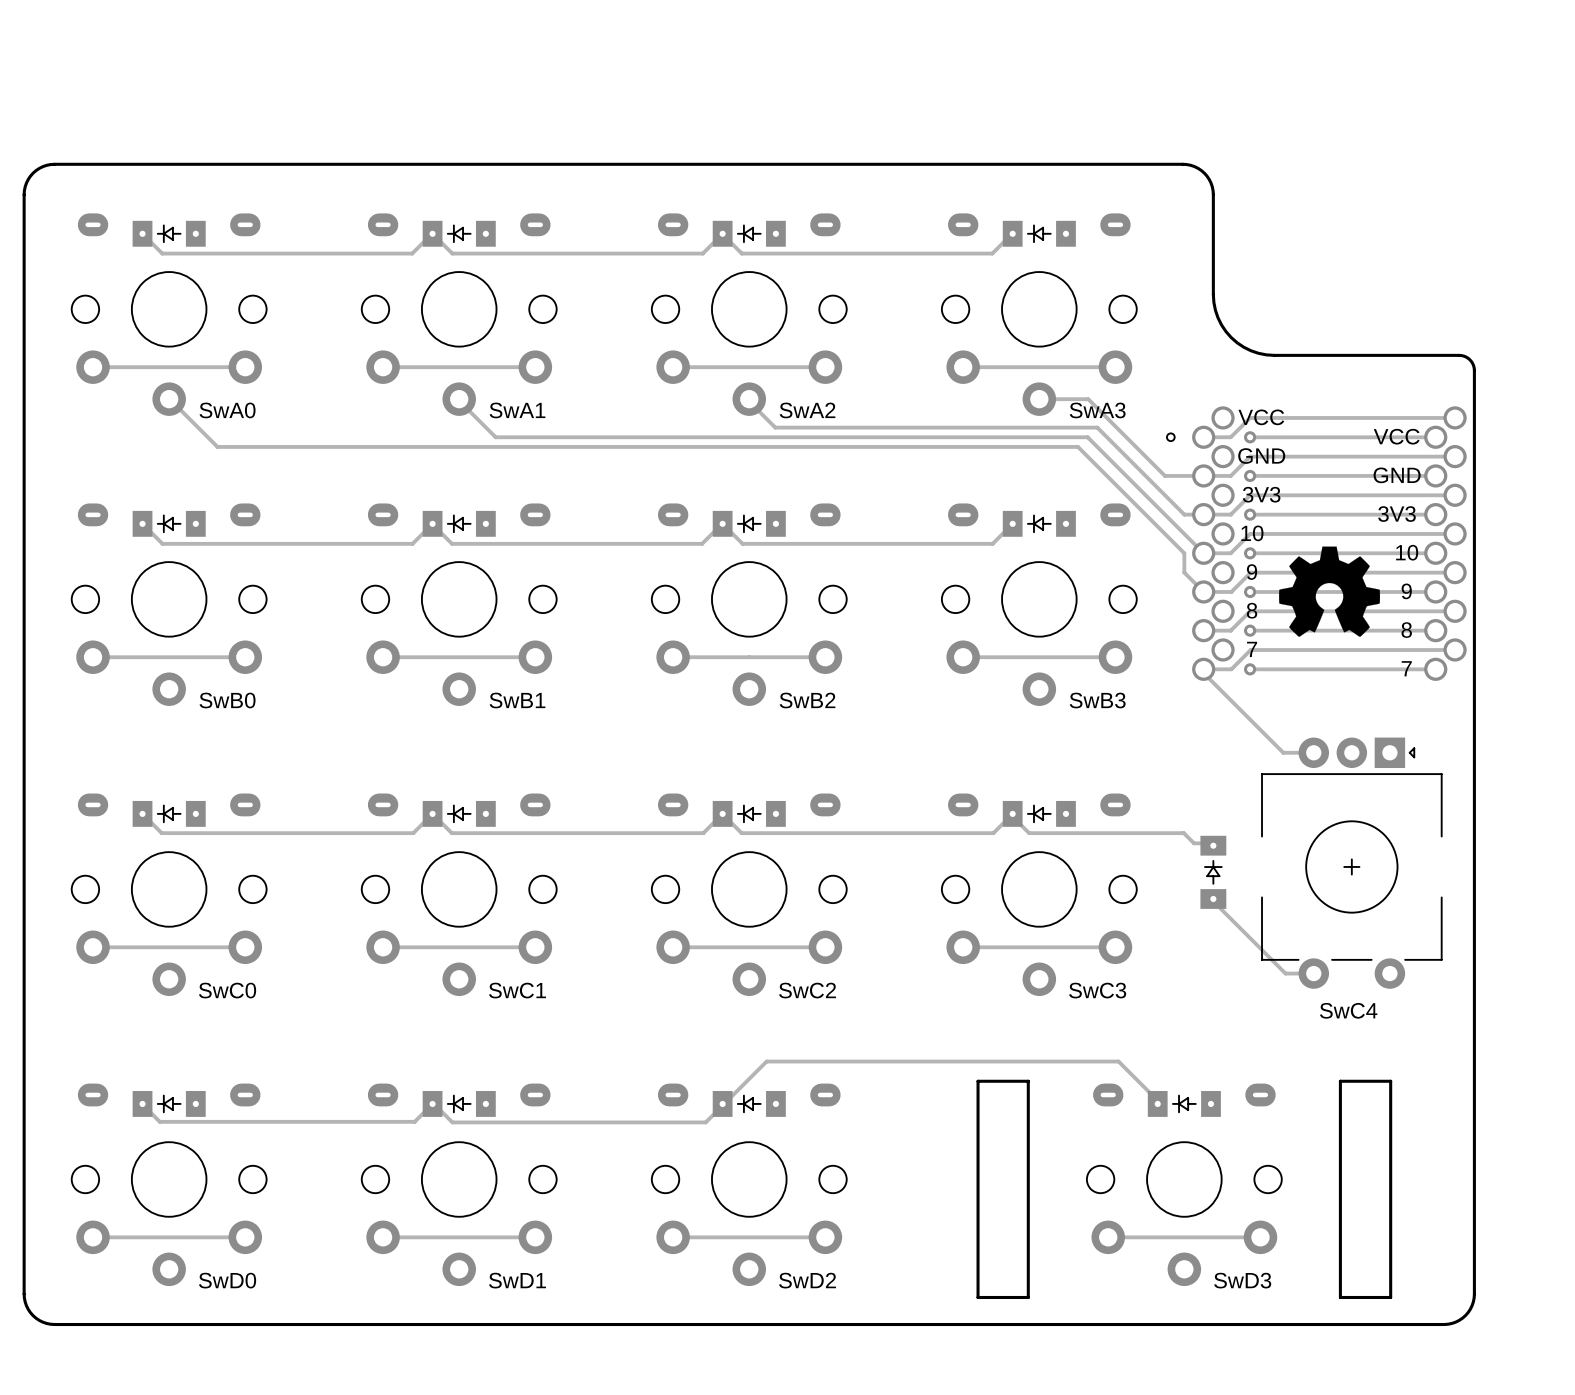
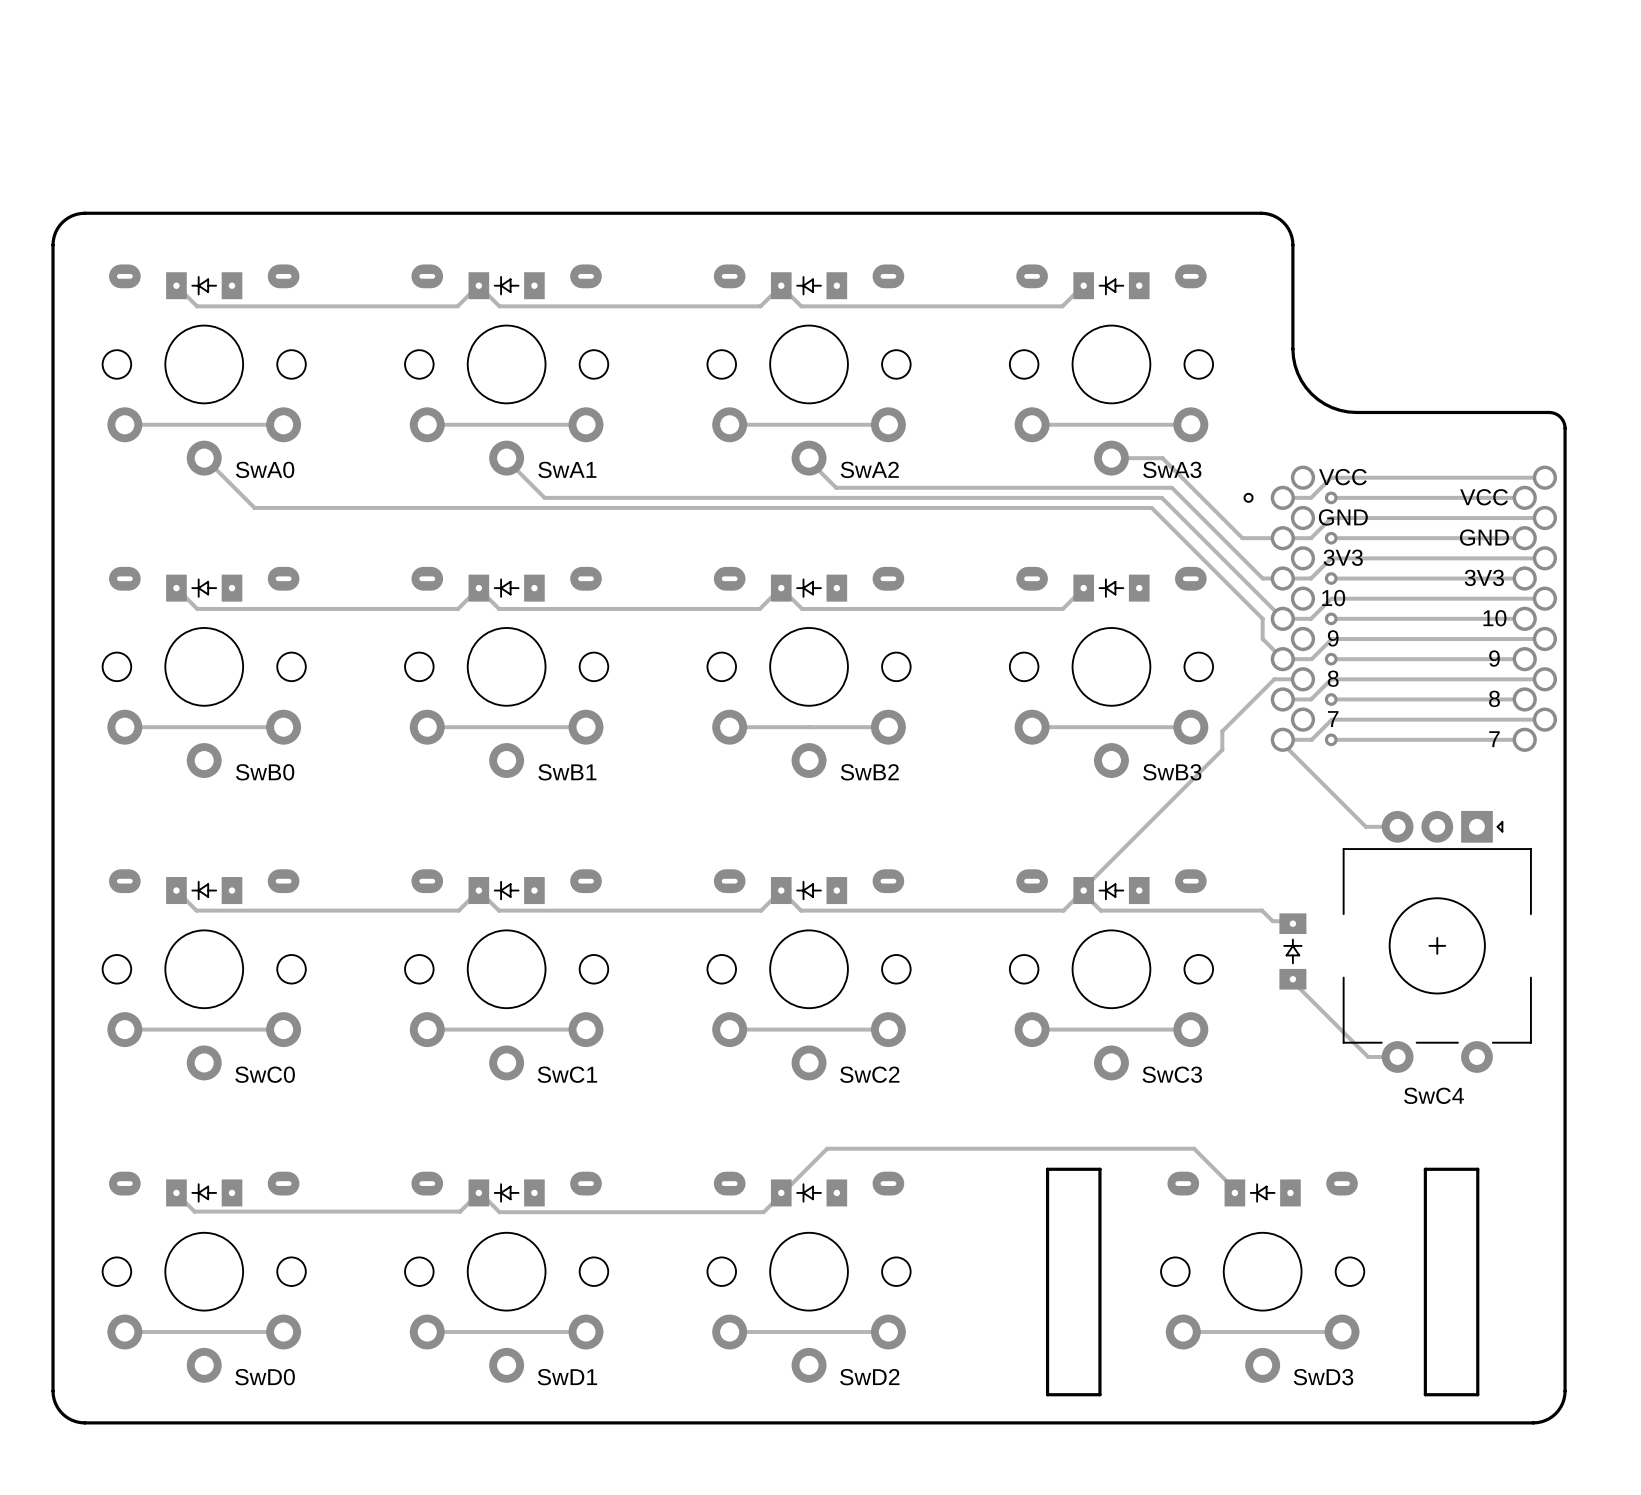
drawing: [1279, 546, 1381, 637] -> none
track: none -> (1302, 679) (1274, 679) (1222, 731) (1222, 749) (1081, 890)

